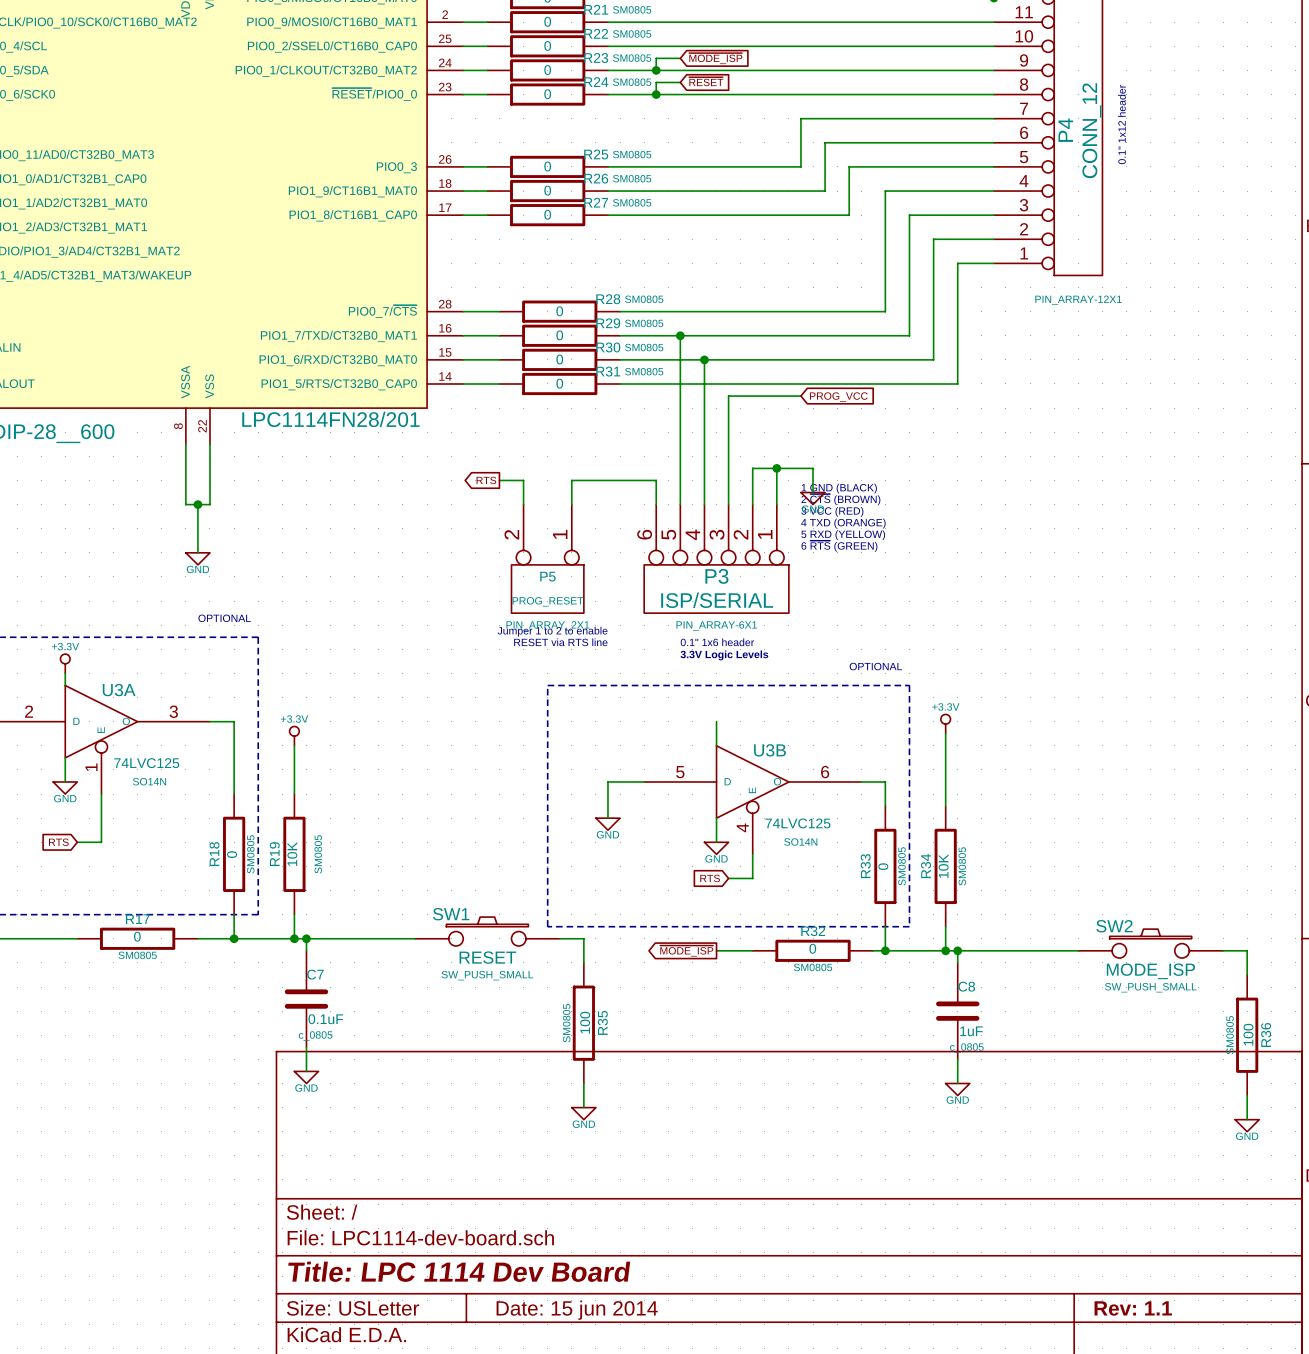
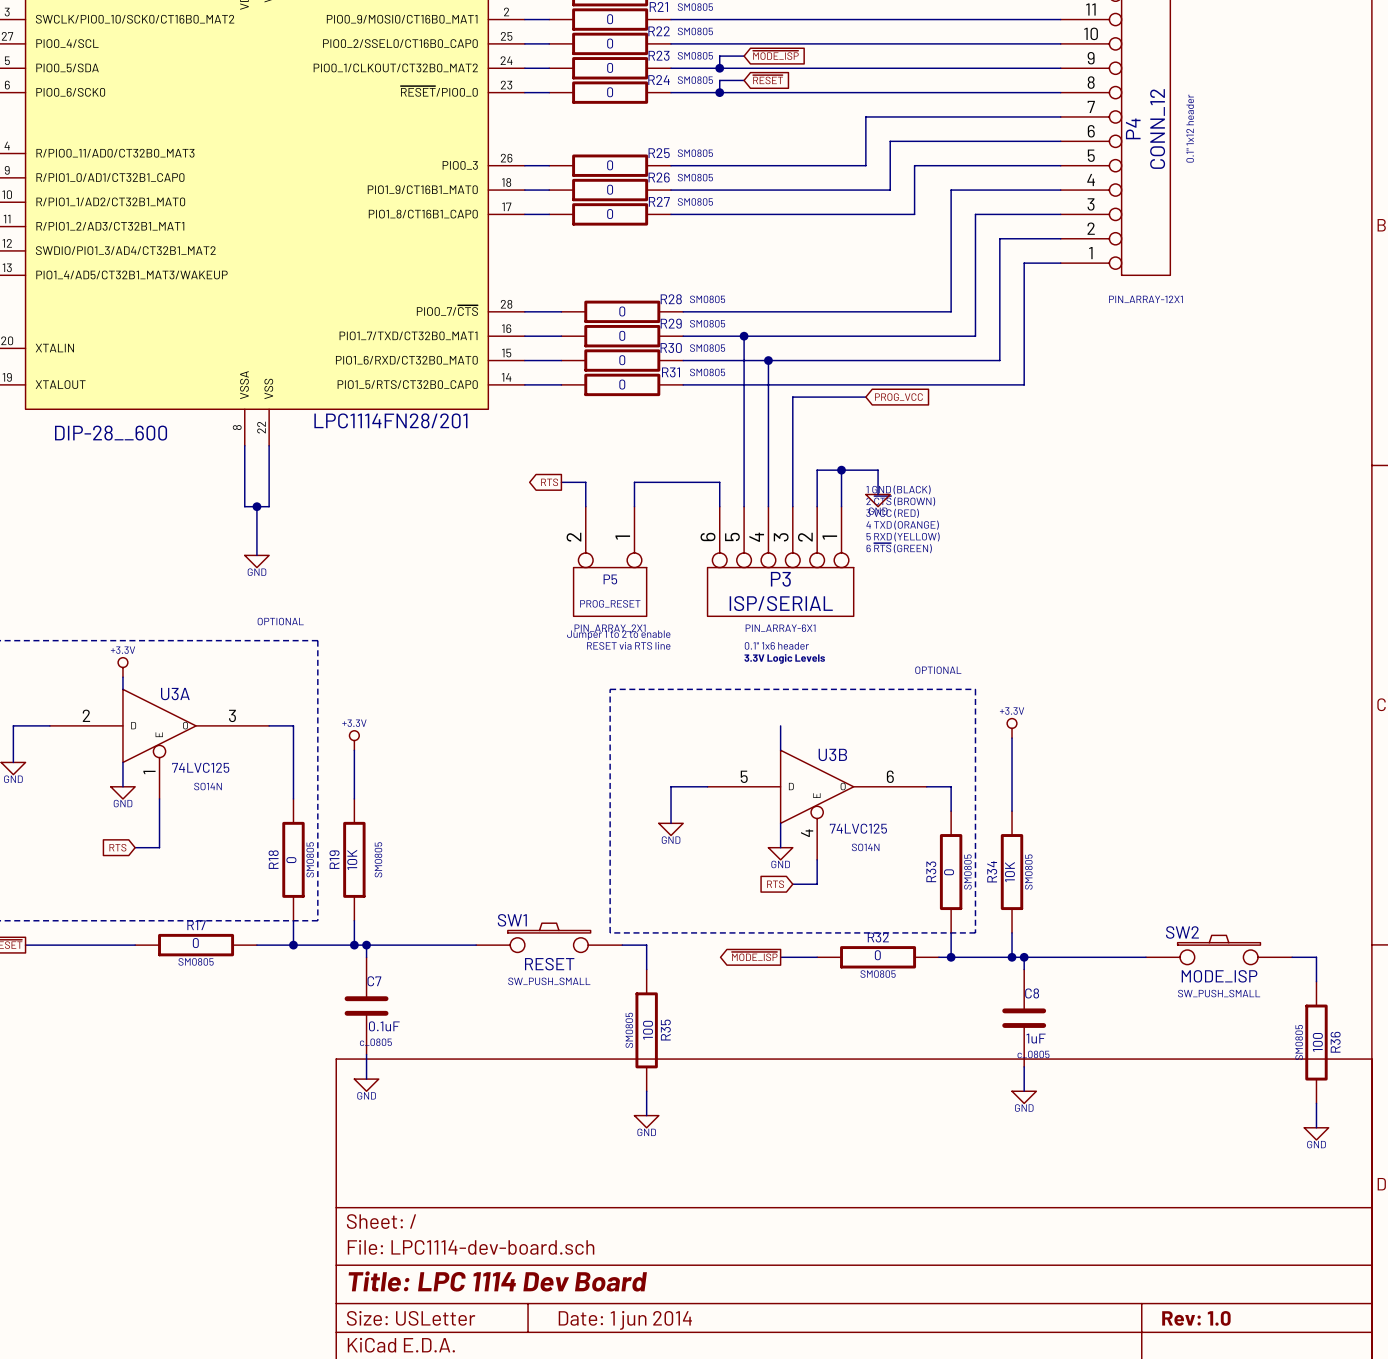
title block: Rev: 1.1 (1133, 1308) -> Rev: 1.0 (1196, 1318)
title block: Date: 15 jun 2014 (577, 1310) -> Date: 1 jun 2014 (625, 1320)

